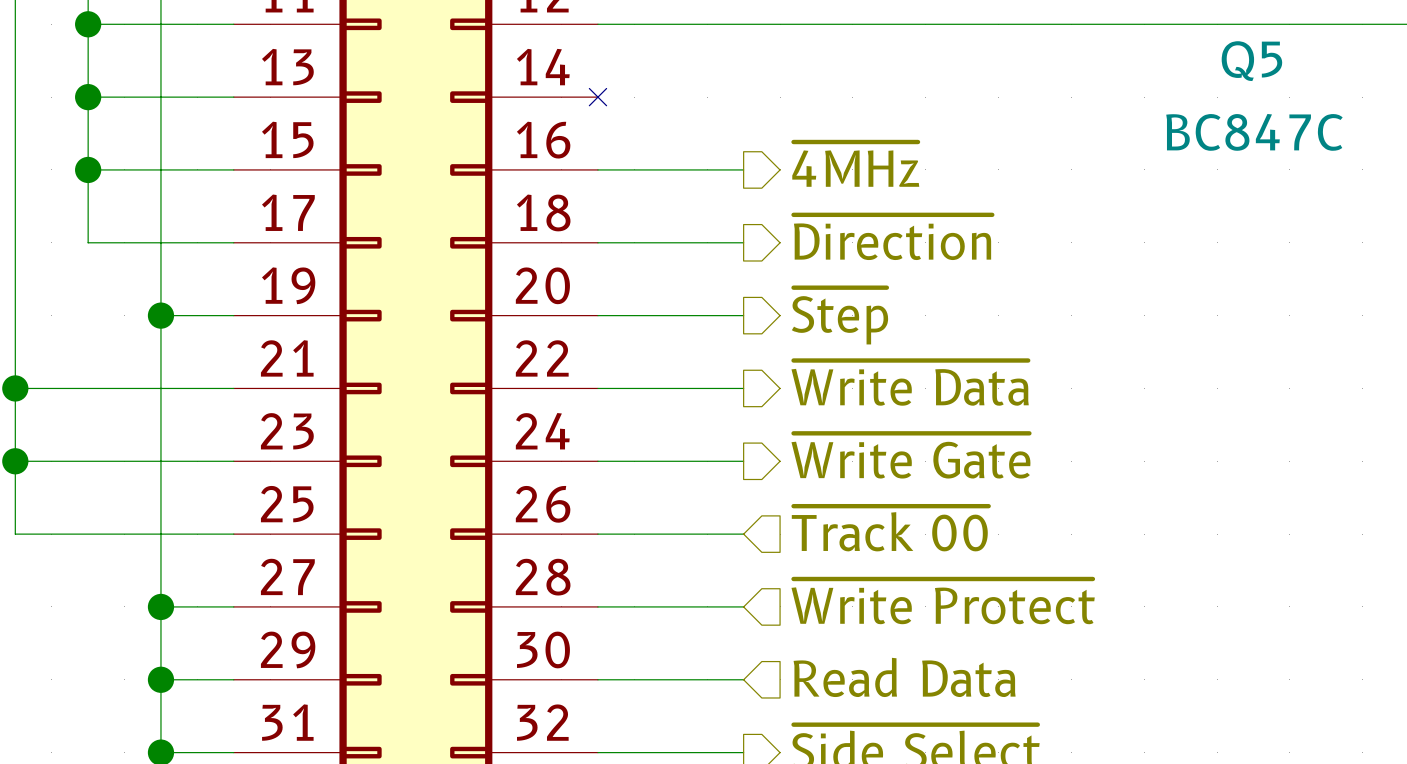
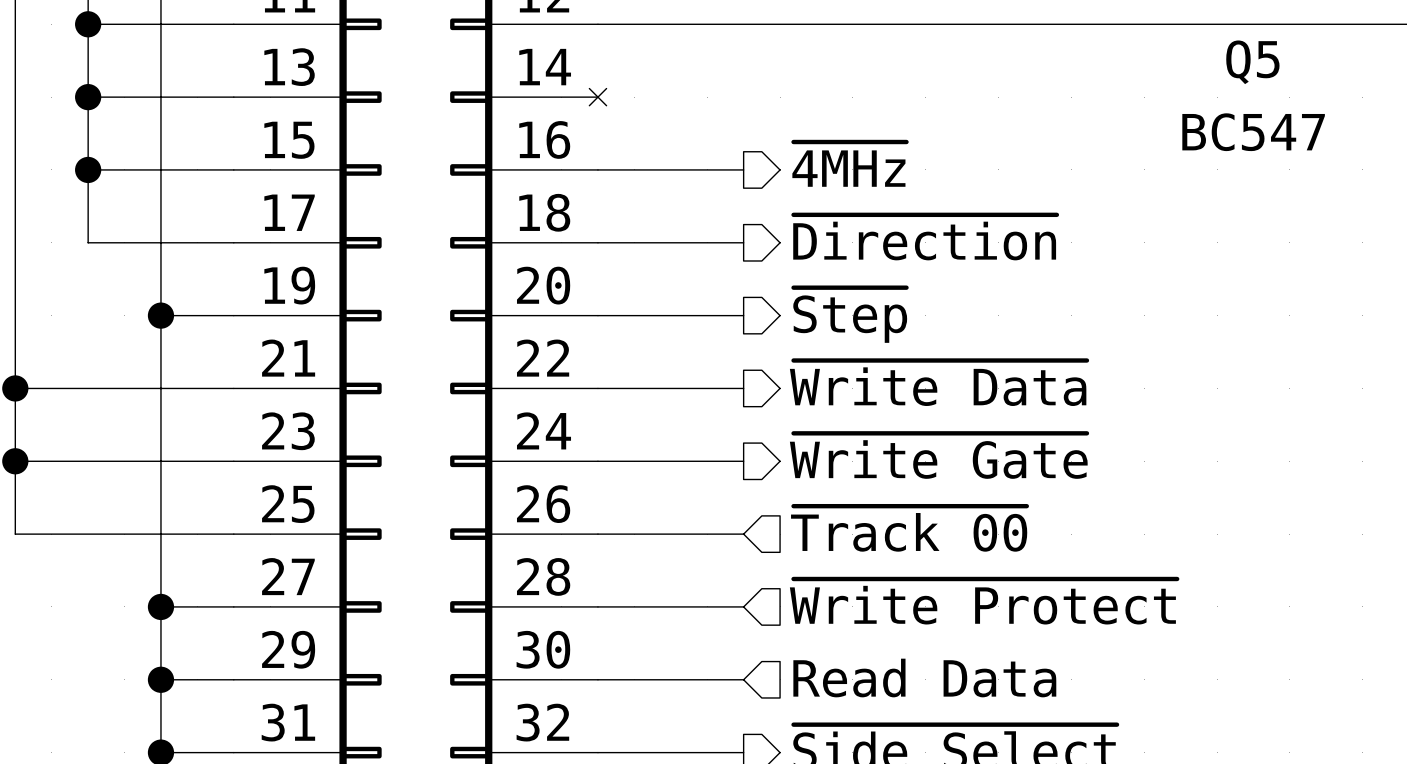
Q5 value: BC847C (1254, 132) -> BC547 (1253, 132)

